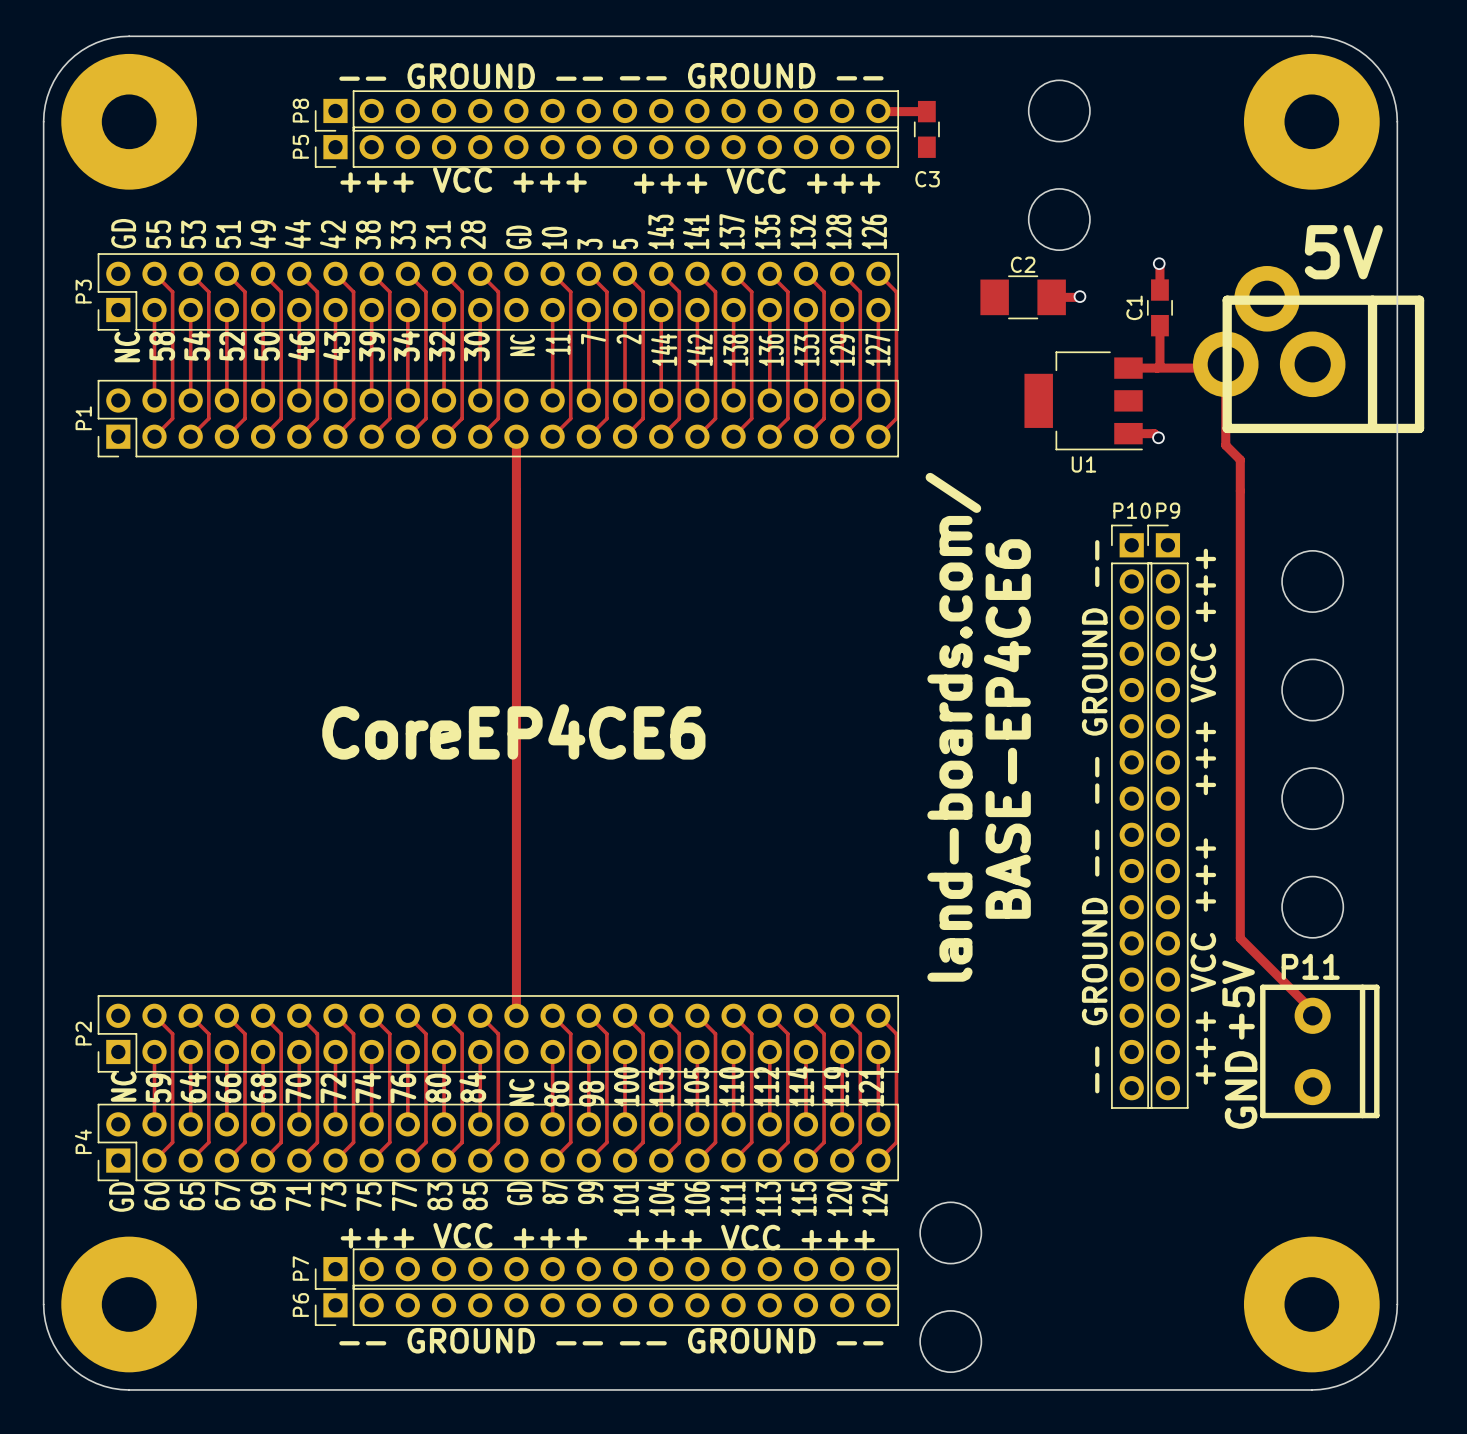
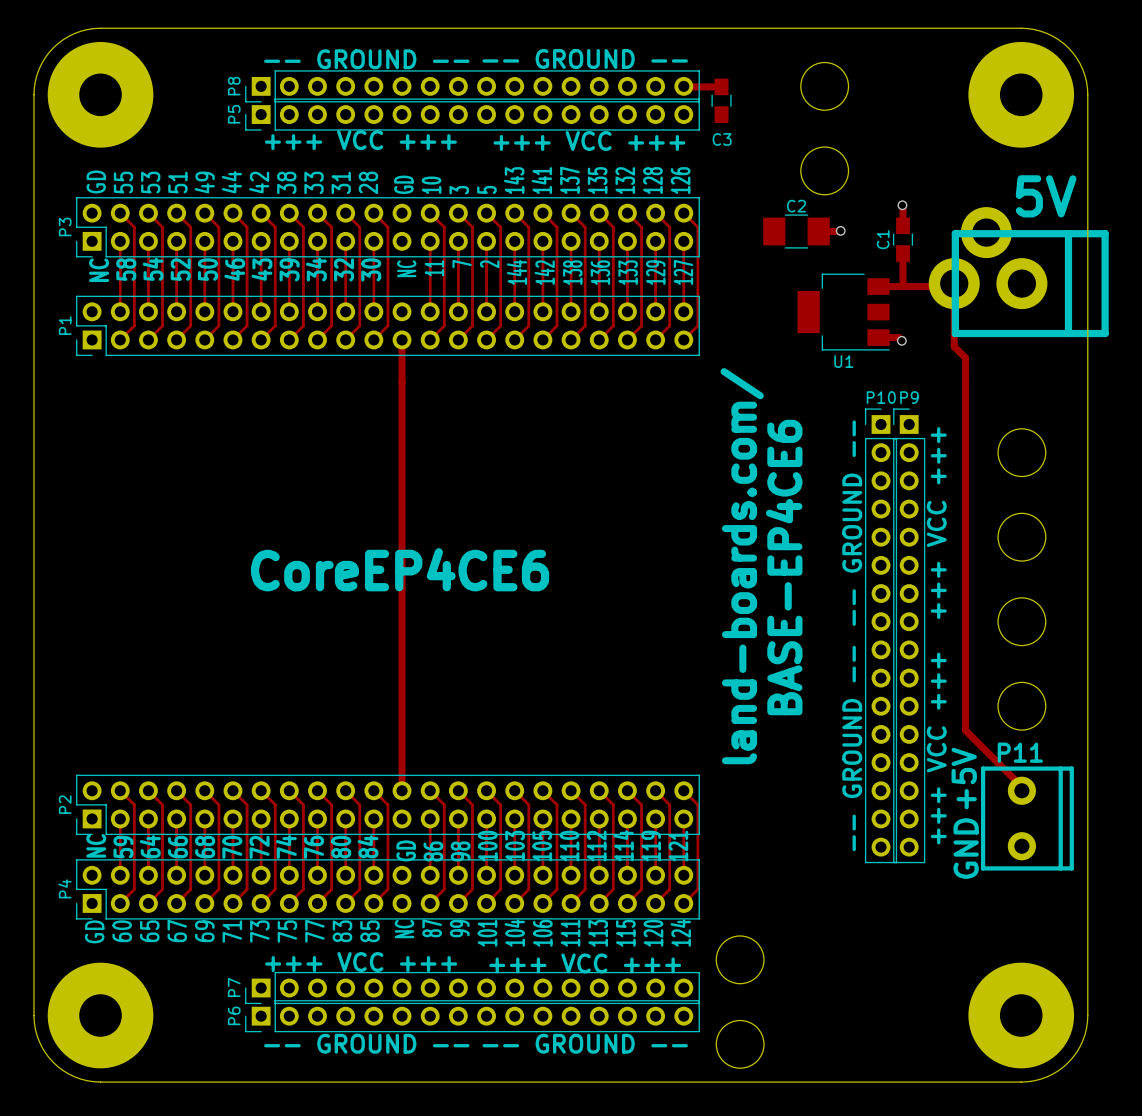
text: NC (521, 1092) -> GD (406, 850)
text: GD (519, 1193) -> NC (404, 929)

